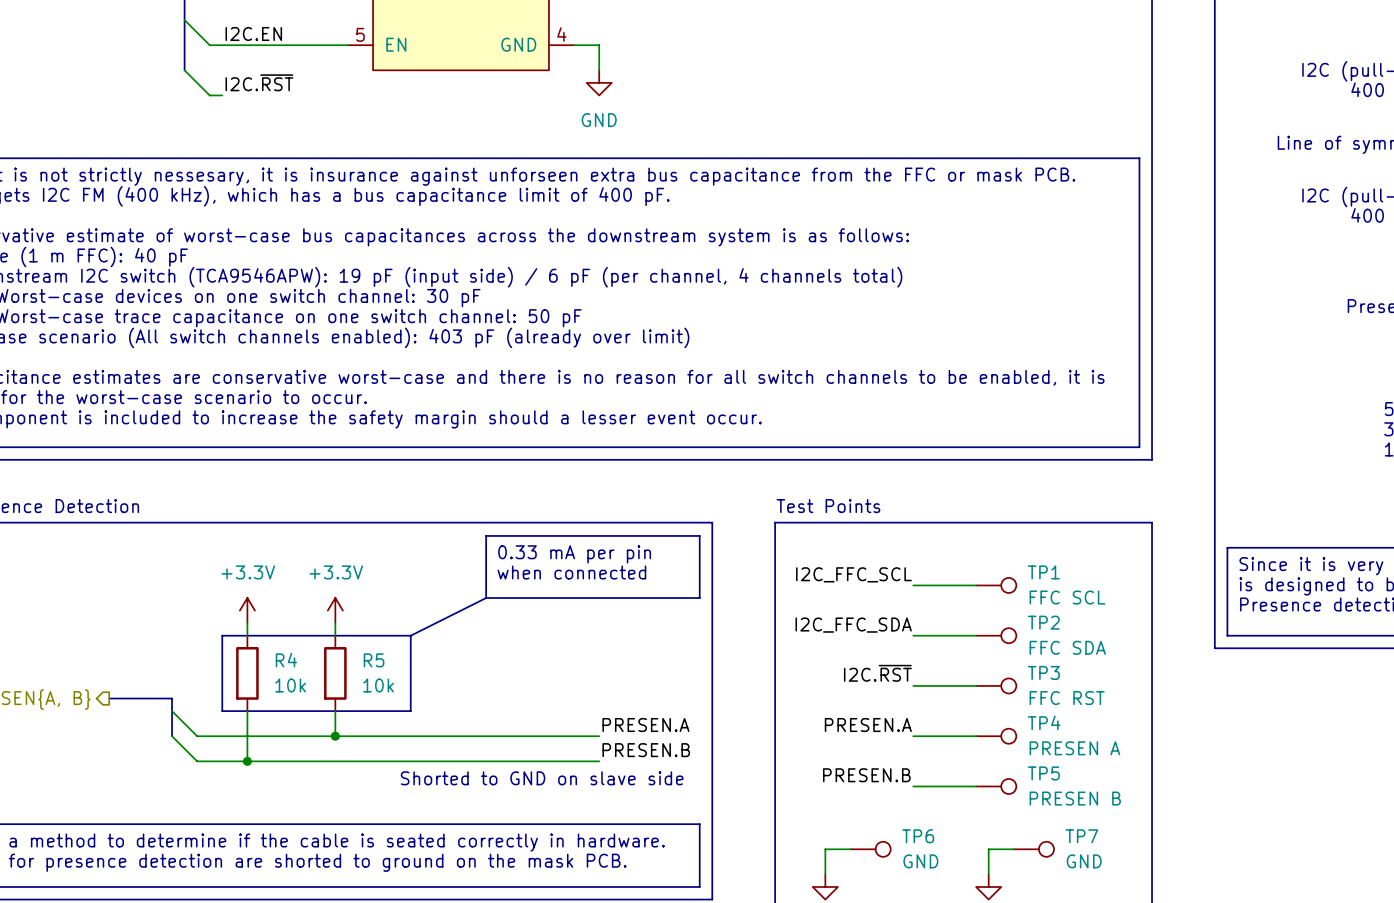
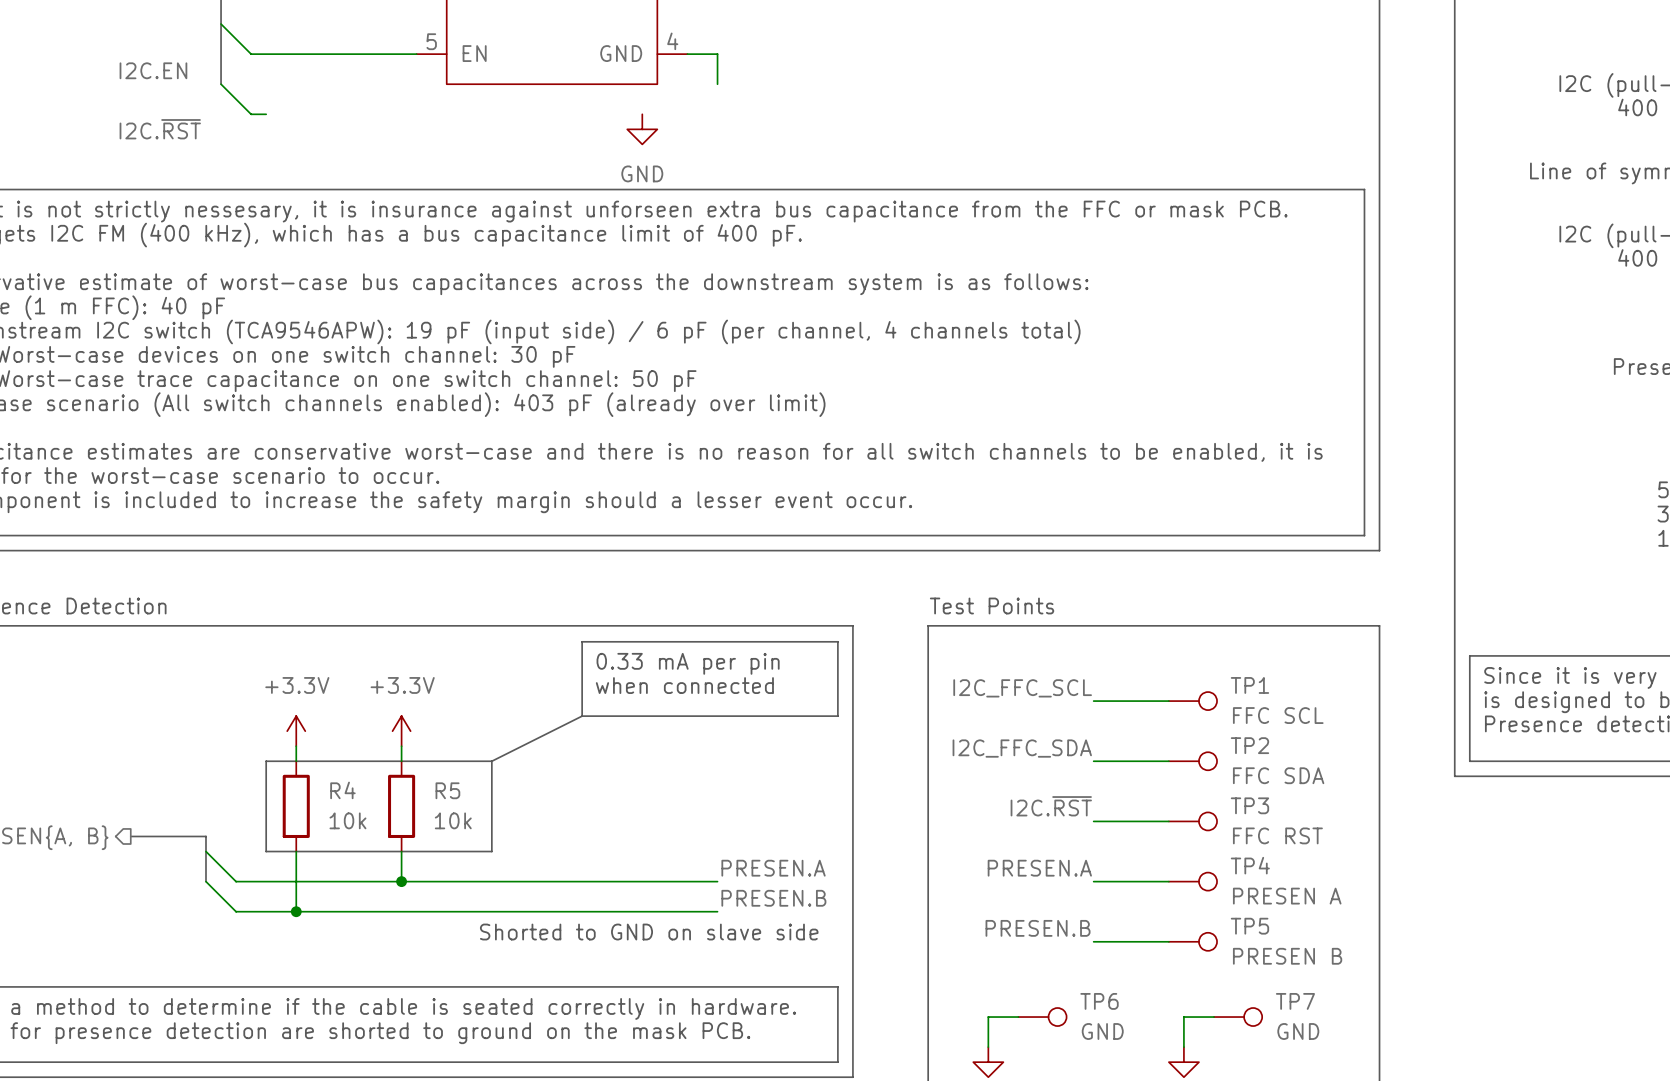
label position: I2C.EN (253, 33) -> I2C.EN (153, 70)
label position: I2C.~{RST} (259, 82) -> I2C.~{RST} (160, 129)
power symbol position: GND (599, 82) -> GND (642, 129)

